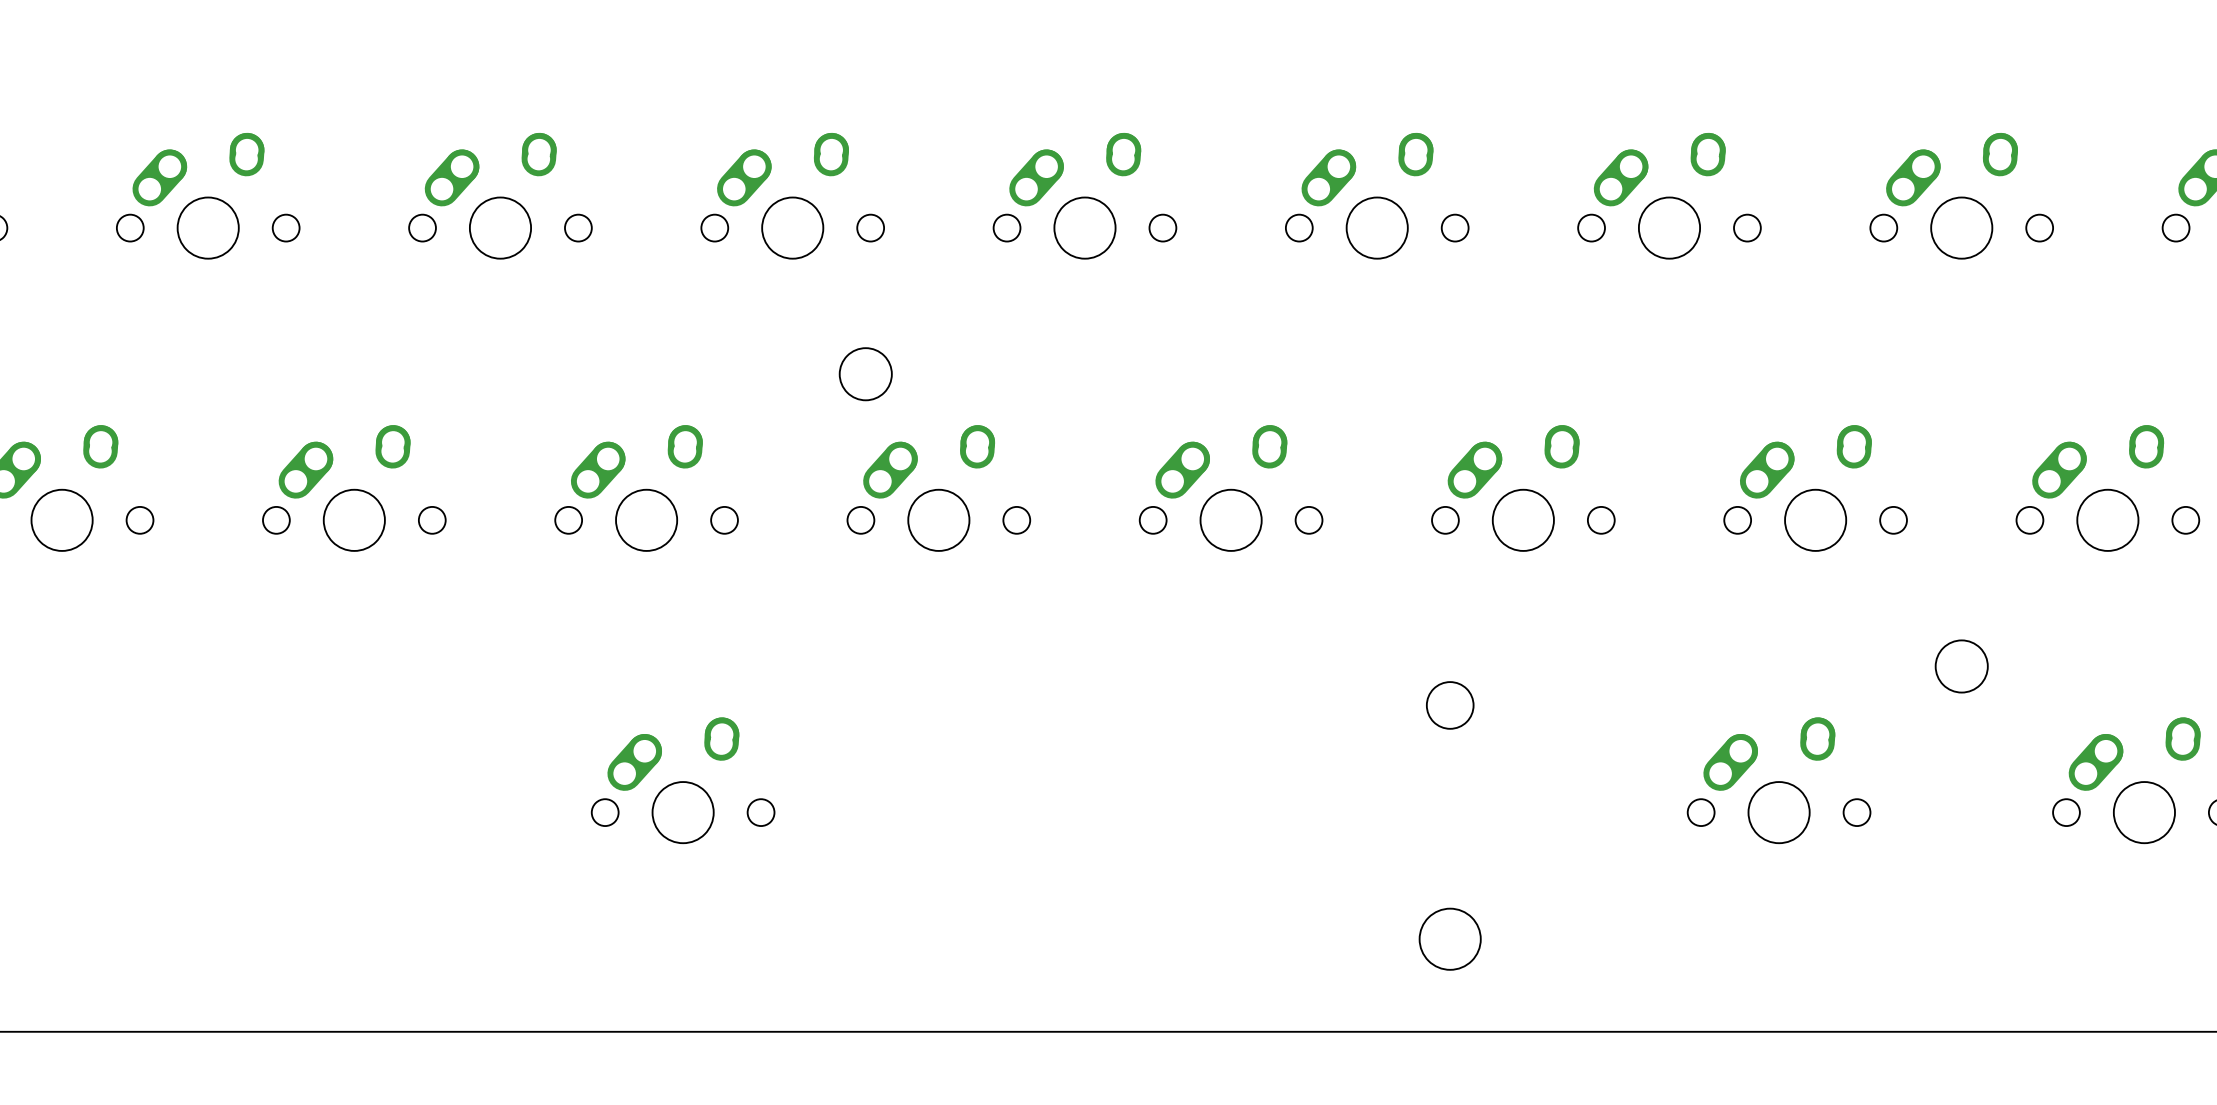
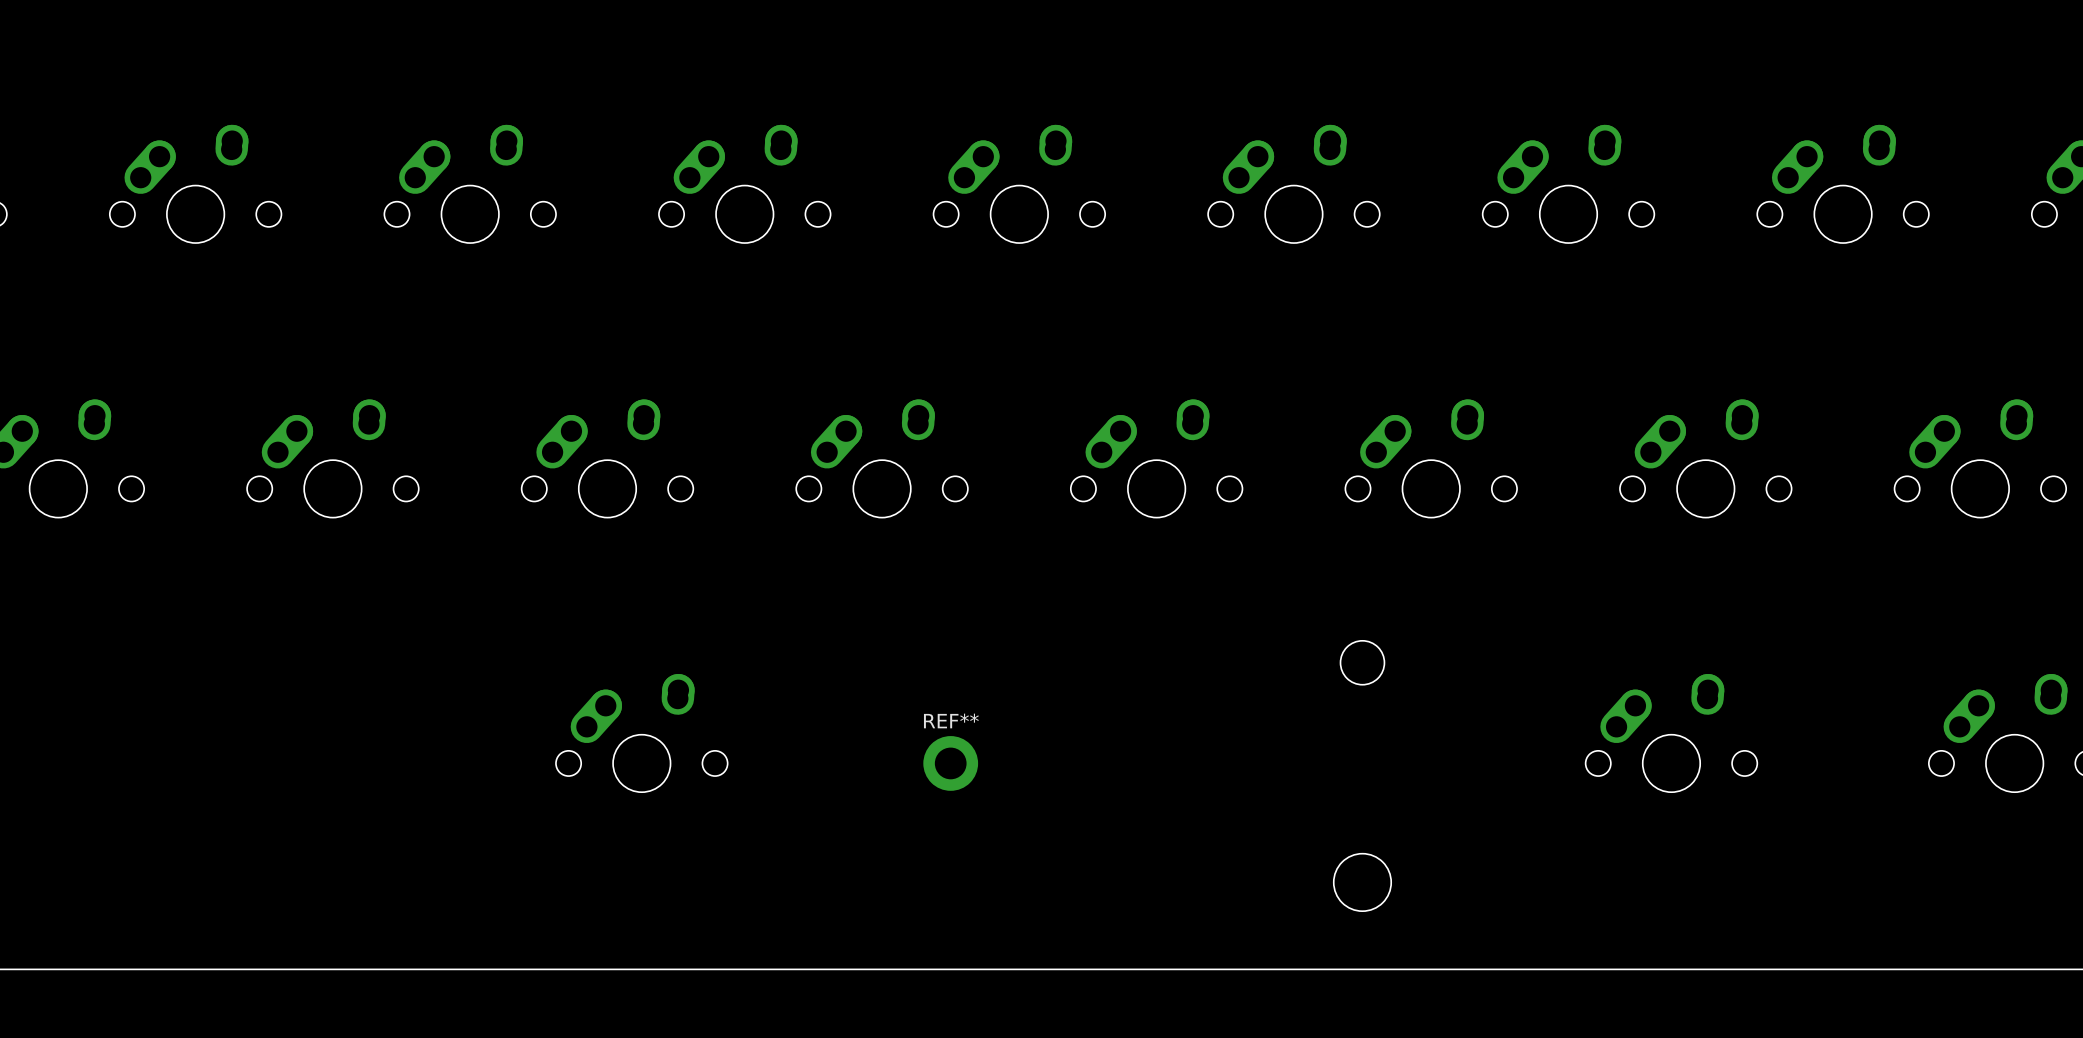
round board edge: [838, 347, 893, 402] -> none
round board edge: [1934, 639, 1989, 694] -> none
REF**: none -> (950, 763)

